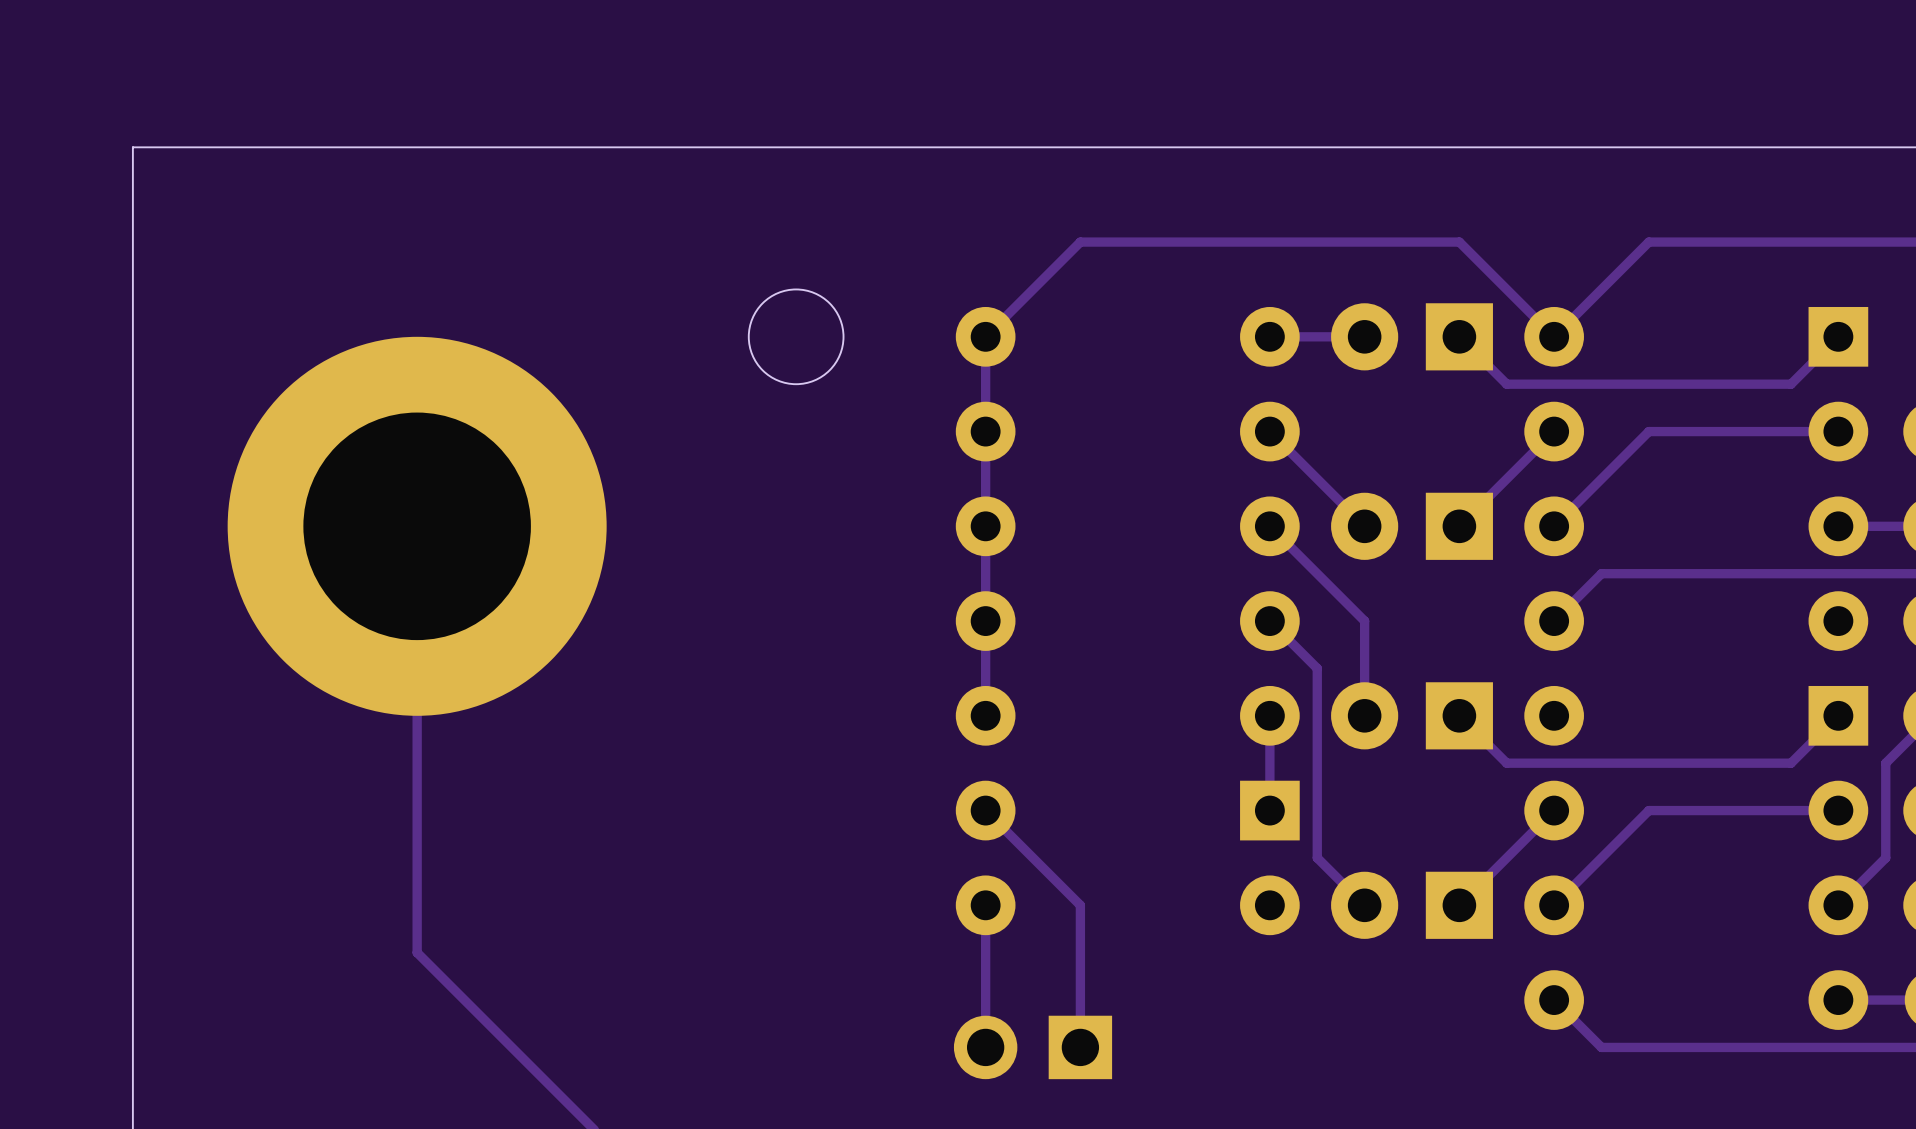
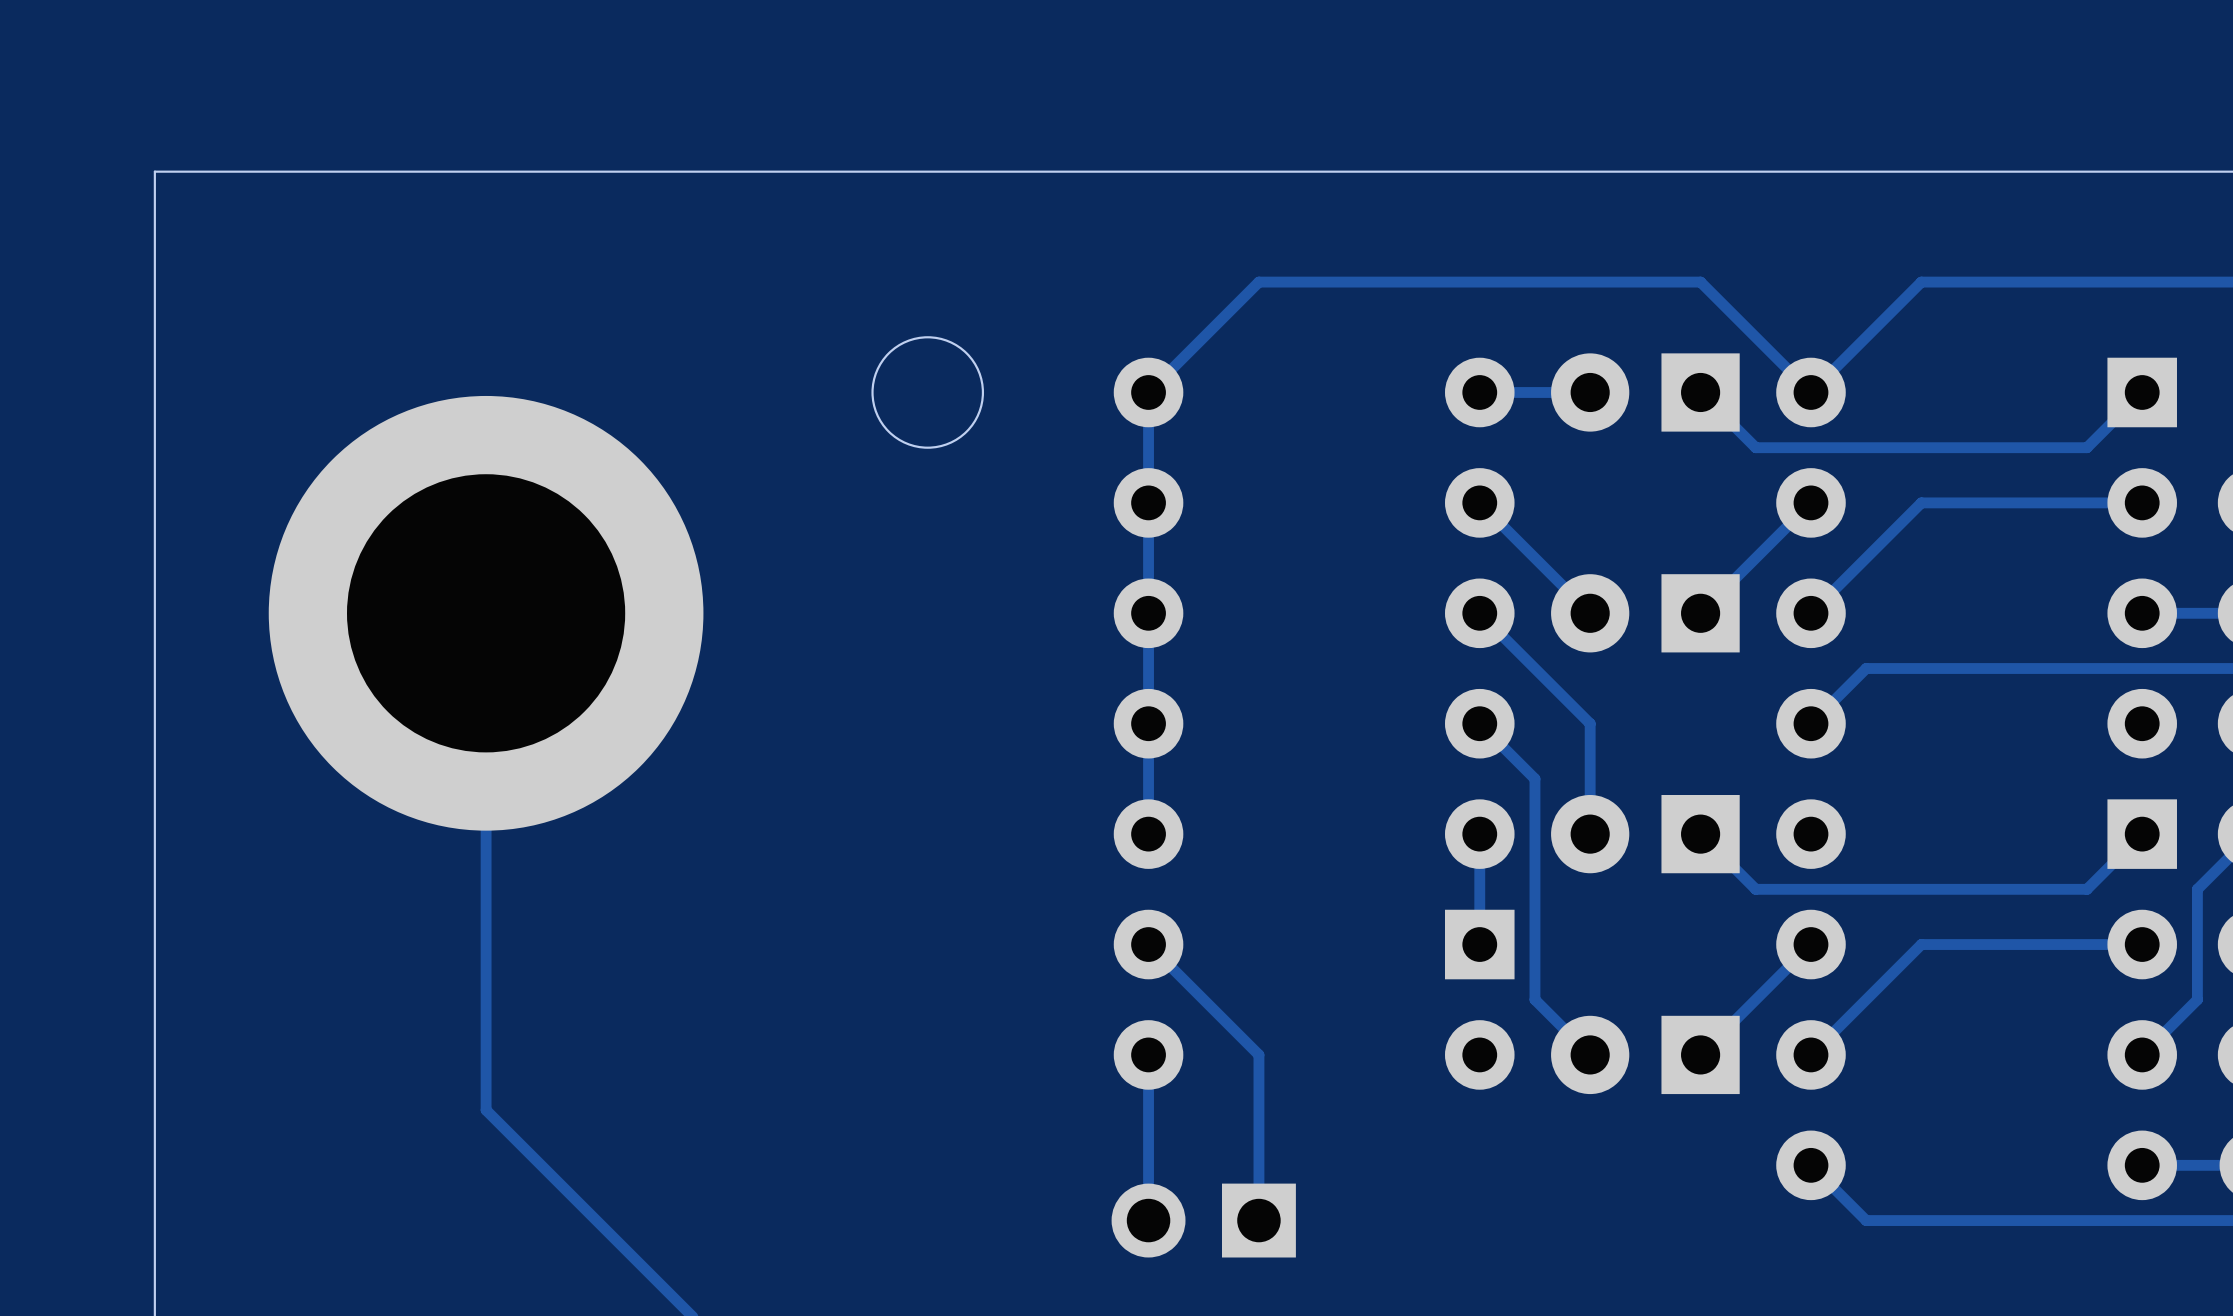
part footprint: [227, 336, 607, 716] -> [268, 395, 704, 831]

